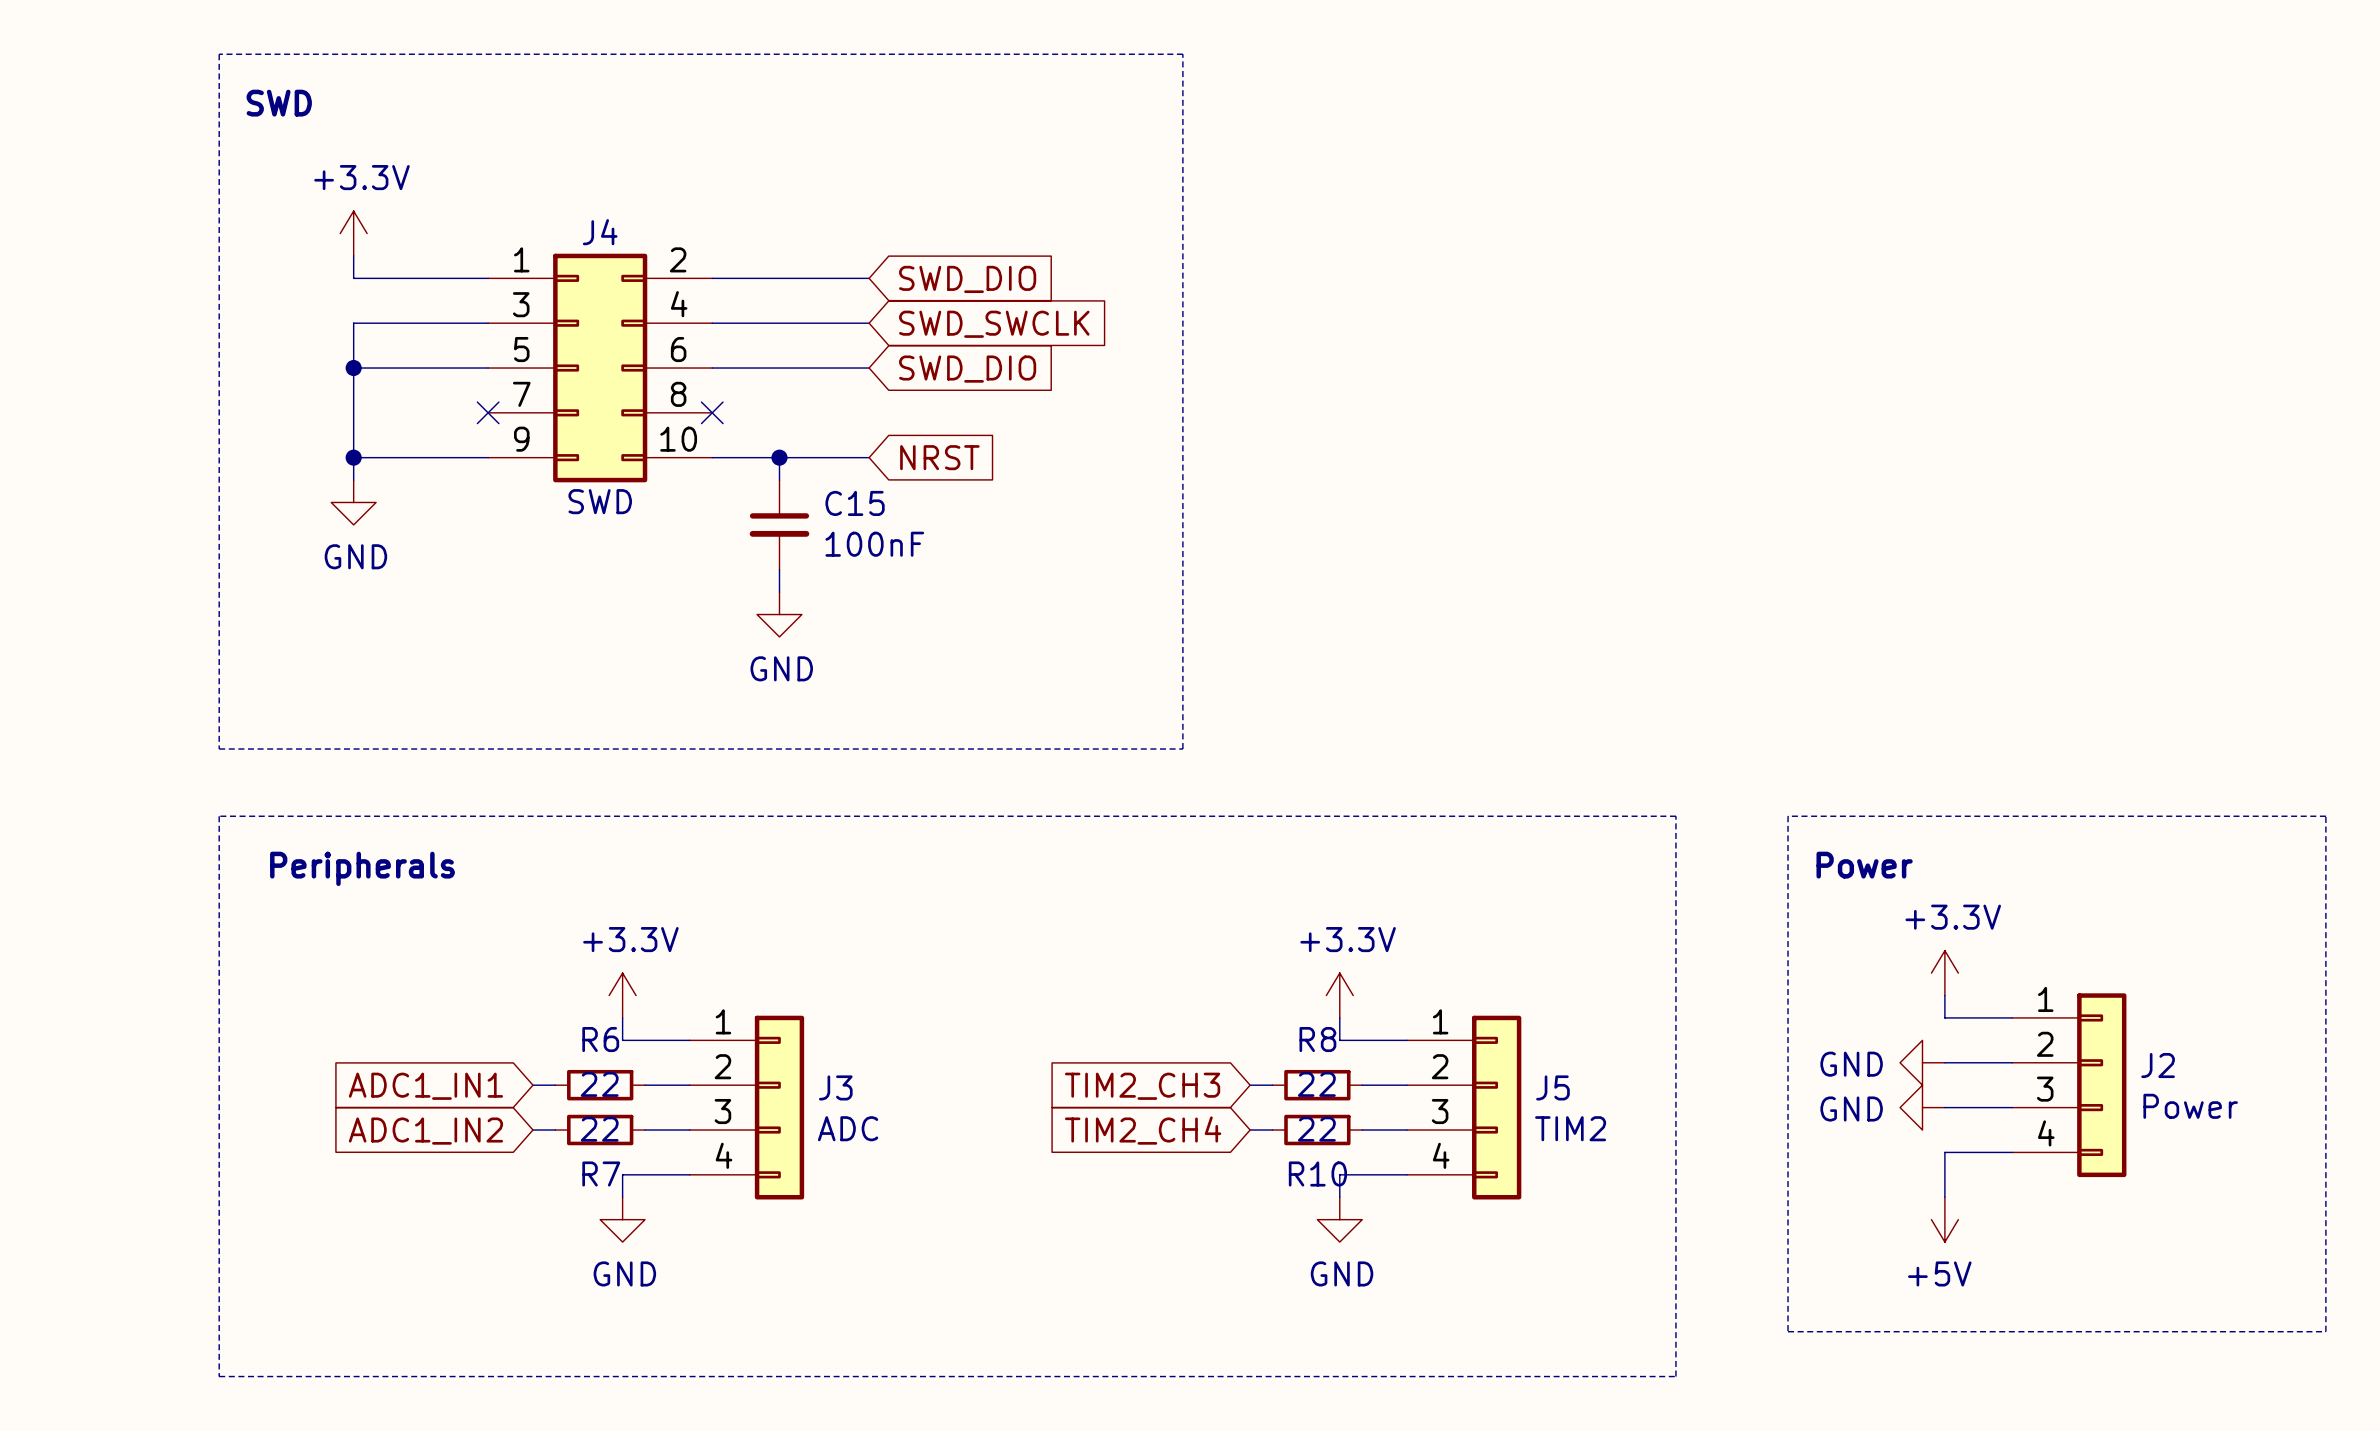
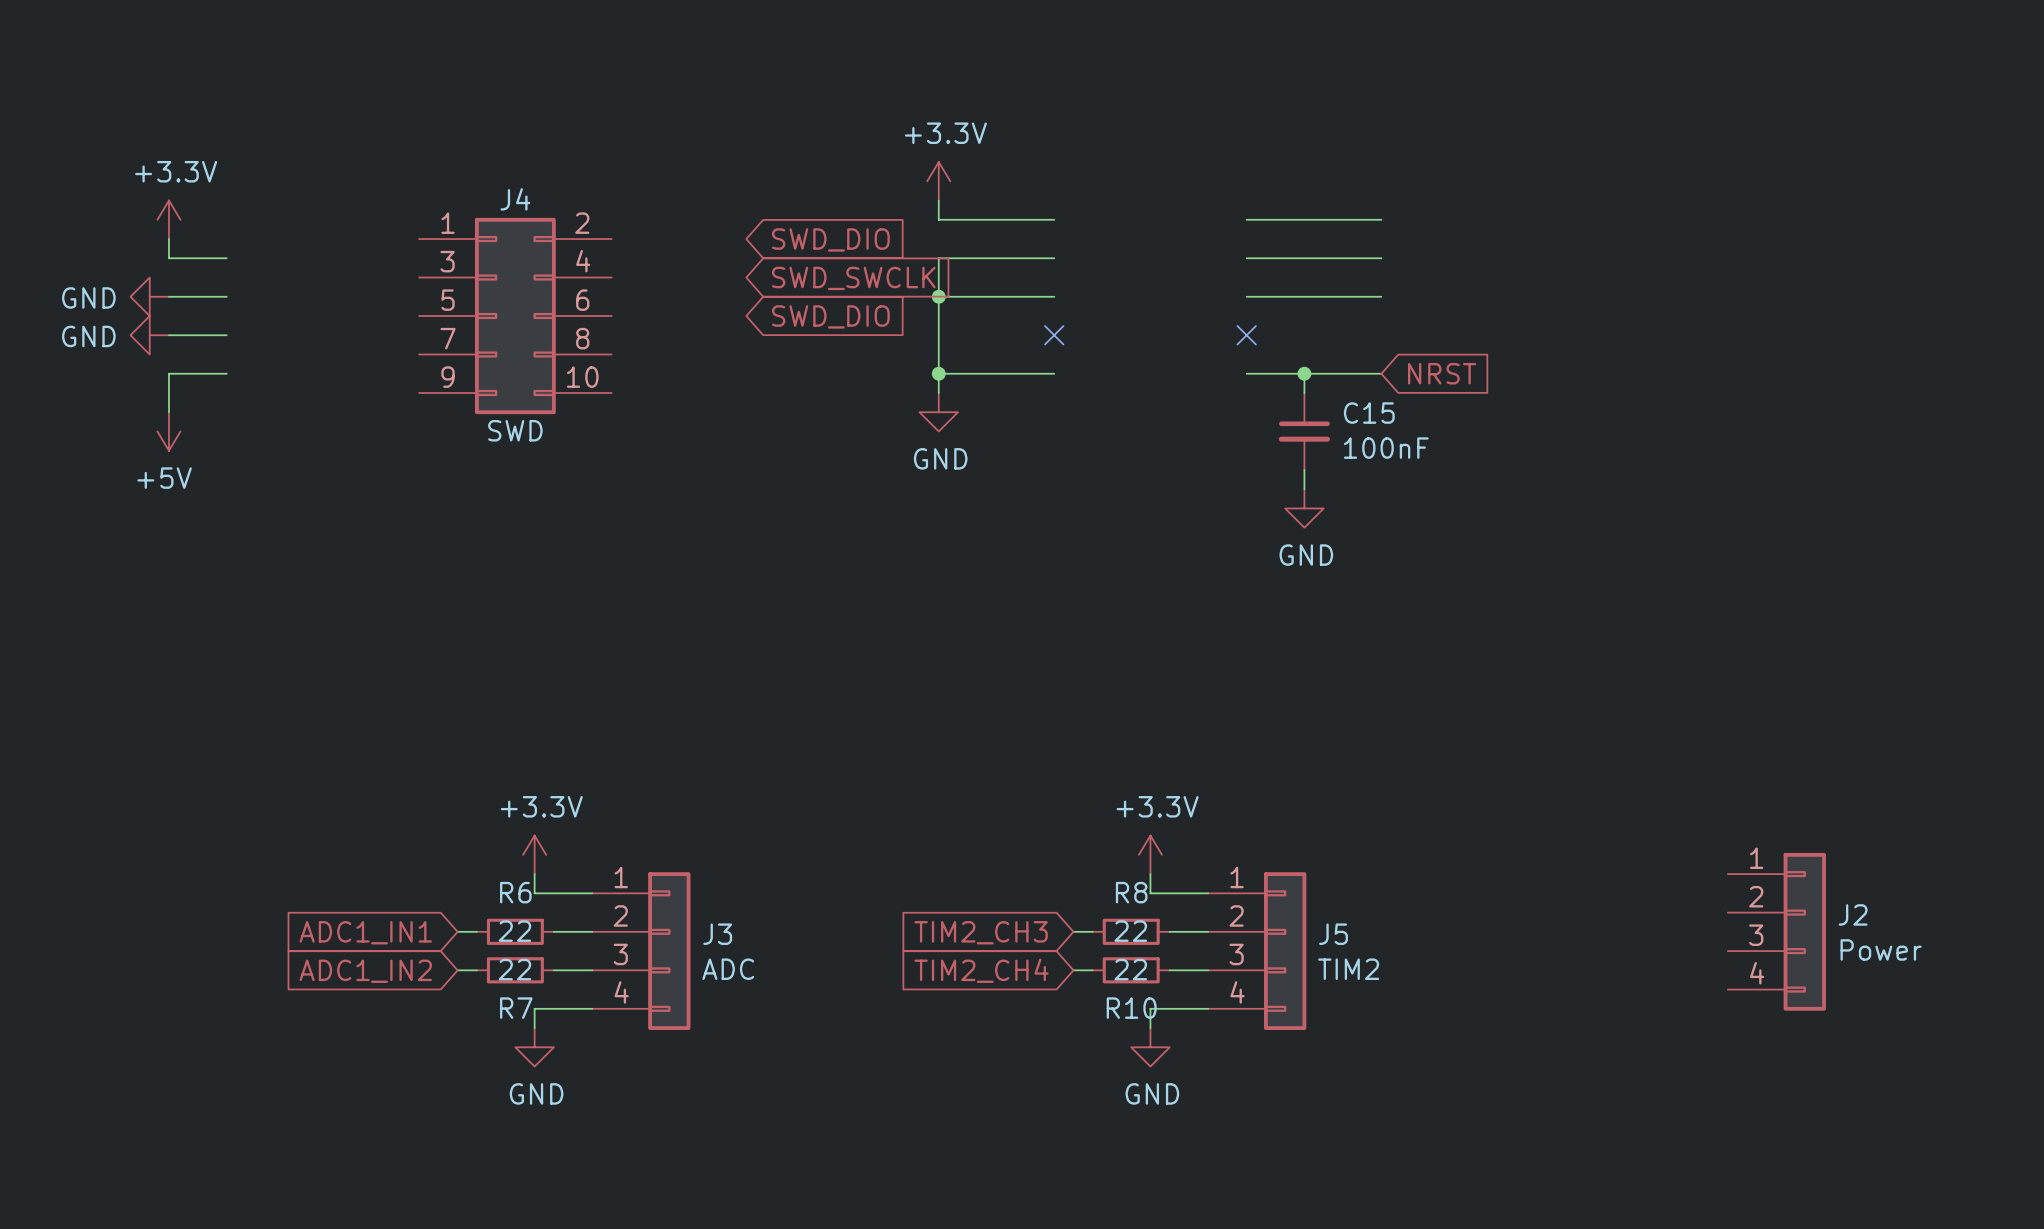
line: (219, 54) (219, 749) (1182, 749) (1182, 54) (219, 54) -> none
text: SWD (279, 103) -> none
power symbol: none -> +3.3V (938, 181)
power symbol position: +3.3V (353, 233) -> +3.3V (168, 219)
wire: none -> (938, 200) (938, 219) (1054, 219)
wire: (353, 255) (353, 278) (488, 278) -> none
wire: none -> (1246, 219) (1381, 219)
wire: none -> (168, 239) (168, 258) (226, 258)
wire: (712, 278) (869, 278) -> none
wire: none -> (1054, 258) (938, 258) (938, 392)
wire: none -> (1246, 258) (1381, 258)
wire: (488, 323) (353, 323) (353, 480) -> none
wire: (712, 323) (869, 323) -> none
power symbol: none -> GND (149, 296)
wire: none -> (168, 296) (226, 296)
wire: none -> (938, 296) (1054, 296)
junction: none -> (938, 296)
wire: none -> (1246, 296) (1381, 296)
wire: (353, 368) (488, 368) -> none
junction: (353, 368) -> none
wire: (712, 368) (869, 368) -> none
power symbol: none -> GND (149, 335)
wire: none -> (168, 335) (226, 335)
no-connect mark: none -> (1054, 335)
no-connect mark: none -> (1246, 335)
no-connect mark: (488, 412) -> none
no-connect mark: (712, 412) -> none
wire: none -> (226, 373) (168, 373) (168, 412)
wire: none -> (938, 373) (1054, 373)
junction: none -> (938, 373)
wire: none -> (1246, 373) (1381, 373)
wire: none -> (1304, 373) (1304, 392)
junction: none -> (1304, 373)
global label: none -> NRST (1442, 373)
wire: (353, 457) (488, 457) -> none
junction: (353, 457) -> none
wire: (712, 457) (869, 457) -> none
wire: (779, 457) (779, 480) -> none
junction: (779, 457) -> none
global label: NRST (939, 457) -> none
power symbol: none -> GND (938, 412)
power symbol: none -> +5V (168, 431)
power symbol: GND (353, 502) -> none
C15 position: (779, 524) -> (1304, 431)
wire: none -> (1304, 469) (1304, 489)
wire: (779, 569) (779, 592) -> none
power symbol: none -> GND (1304, 508)
power symbol: GND (779, 614) -> none
line: (219, 816) (219, 1376) (1675, 1376) (1675, 816) (219, 816) -> none
line: (1788, 816) (2325, 816) (2325, 1331) (1788, 1331) (1788, 816) -> none
text: Power (1864, 865) -> none
text: Peripherals (362, 868) -> none
power symbol: +3.3V (1944, 973) -> none
wire: (1944, 995) (1944, 1017) (2012, 1017) -> none
power symbol: GND (1922, 1062) -> none
wire: (1944, 1062) (2012, 1062) -> none
power symbol: GND (1922, 1107) -> none
wire: (1944, 1107) (2012, 1107) -> none
wire: (2012, 1152) (1944, 1152) (1944, 1197) -> none
power symbol: +5V (1944, 1219) -> none

